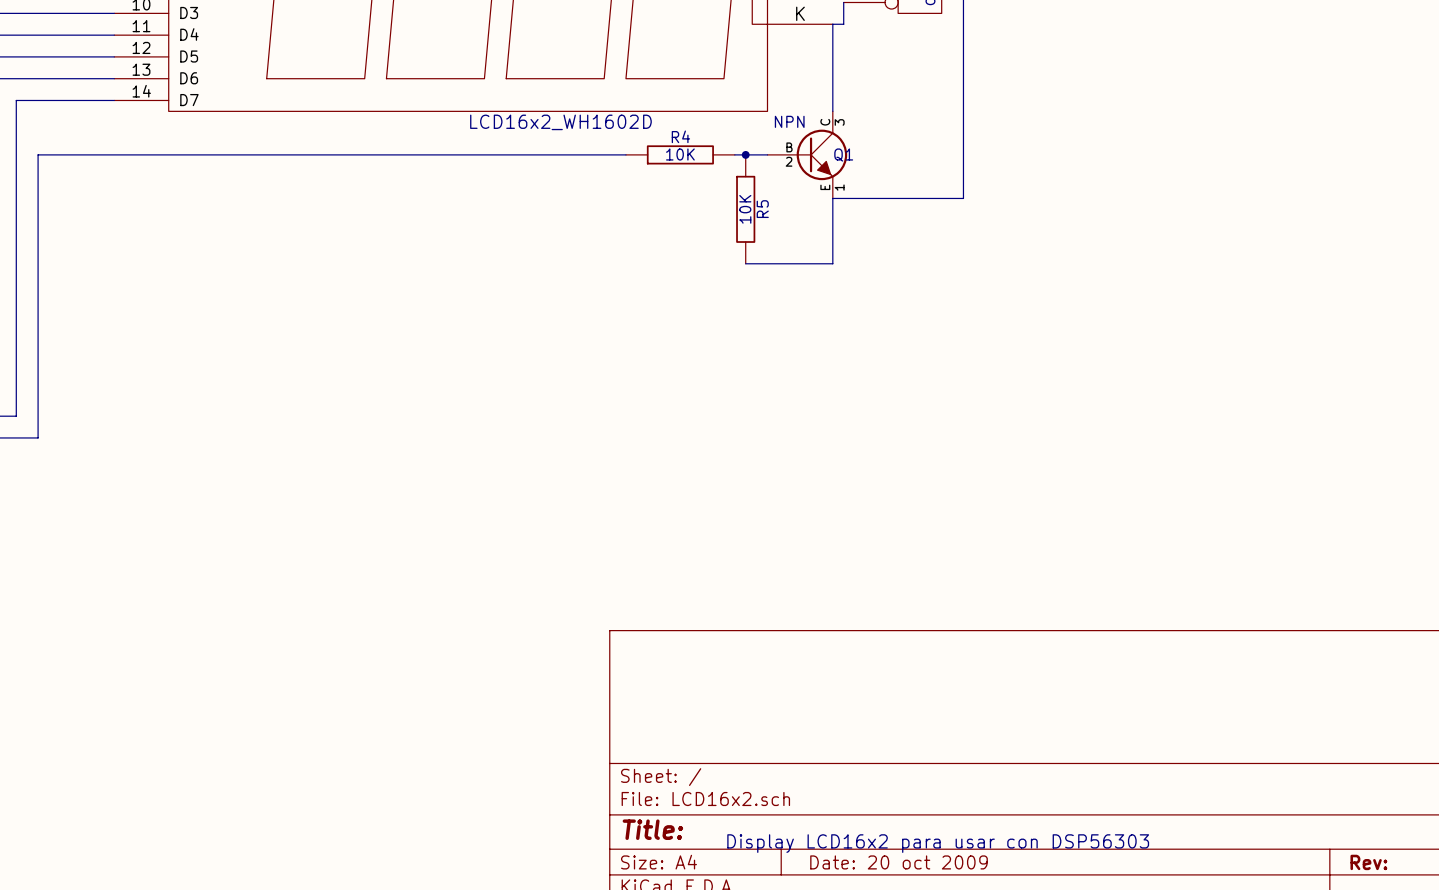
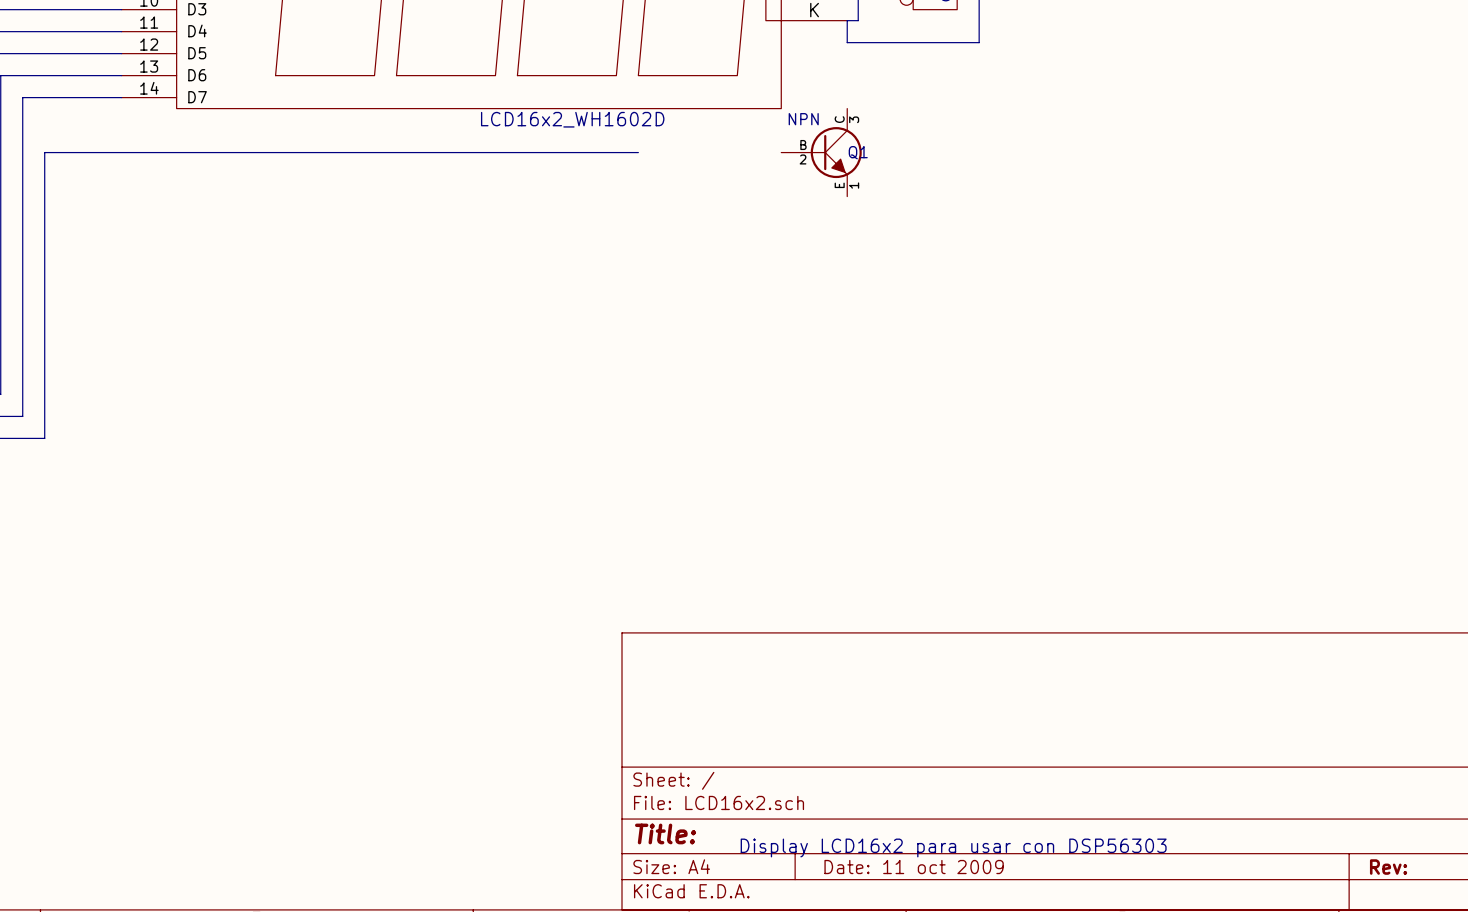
wire: (832, 46) (832, 111) -> (847, 42) (979, 42)
wire: (963, 46) (963, 198) (832, 198) (832, 263) (745, 263) -> none
R4: 10K (680, 154) -> none
wire: (734, 154) (767, 154) -> none
junction: (745, 154) -> none
R5: 10K (745, 209) -> none
title block: Date: 20 oct 2009 (899, 862) -> Date: 11 oct 2009 (914, 867)

